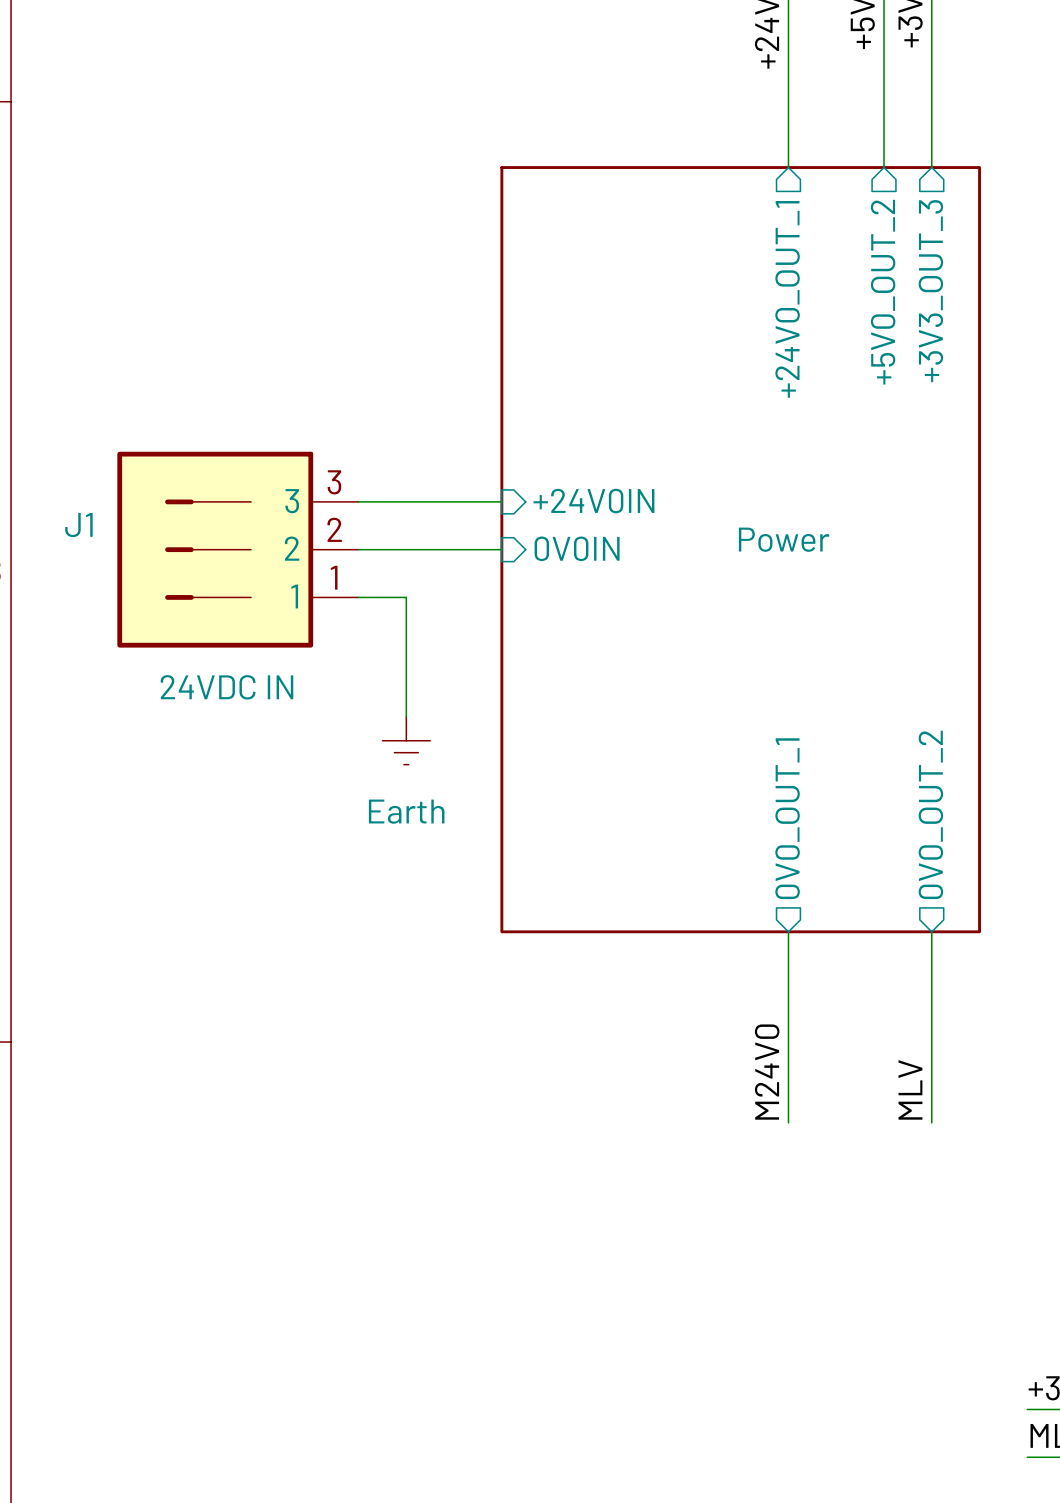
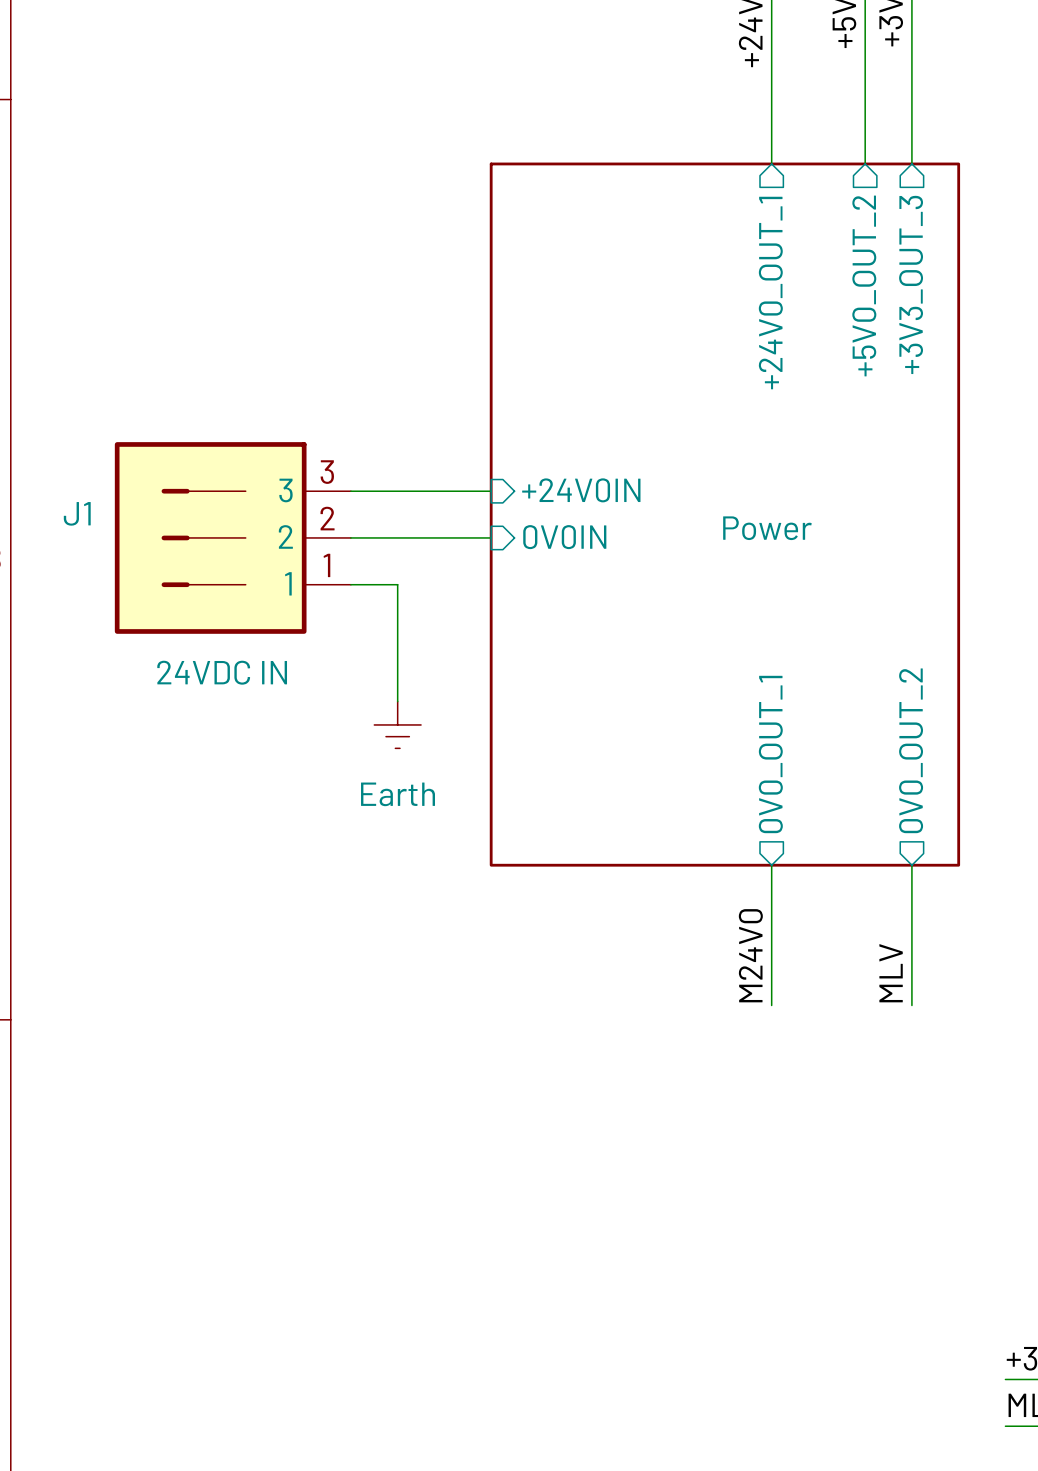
sheet Power: none -> (724, 514)
sheet Power: (740, 549) -> none
sheet pin position: 0V0_OUT_2 (930, 814) -> 0V0_OUT_2 (911, 750)
sheet pin position: 0V0_OUT_1 (787, 818) -> 0V0_OUT_1 (770, 754)
wire: none -> (771, 865) (771, 911)
wire: none -> (911, 865) (911, 911)
wire: (788, 1027) (788, 1122) -> none
wire: (931, 1027) (931, 1122) -> none
label position: M24V0 (767, 1072) -> M24V0 (750, 955)
label position: MLV (910, 1089) -> MLV (891, 973)

